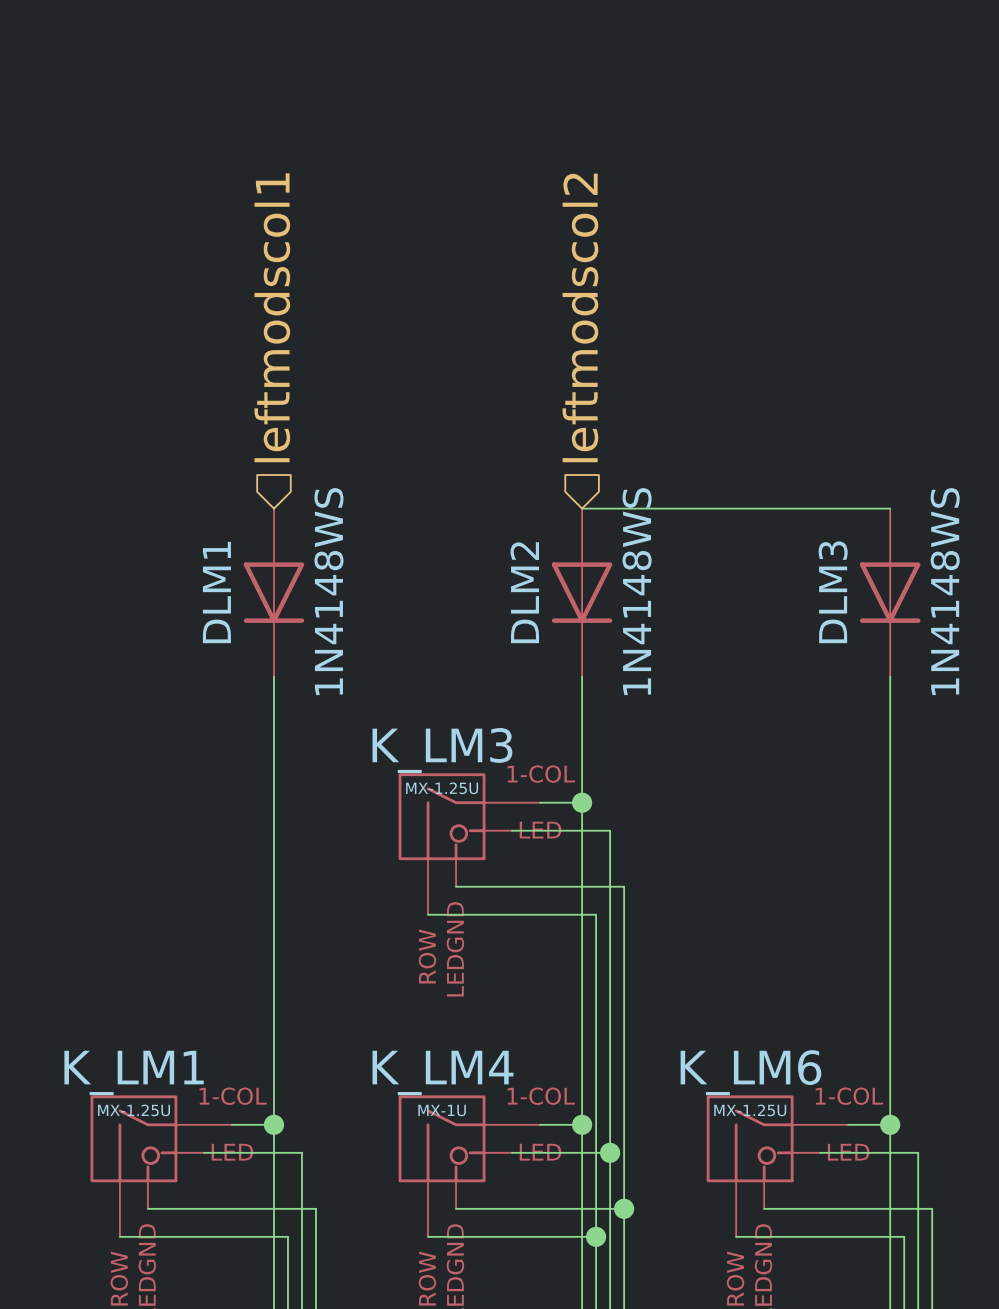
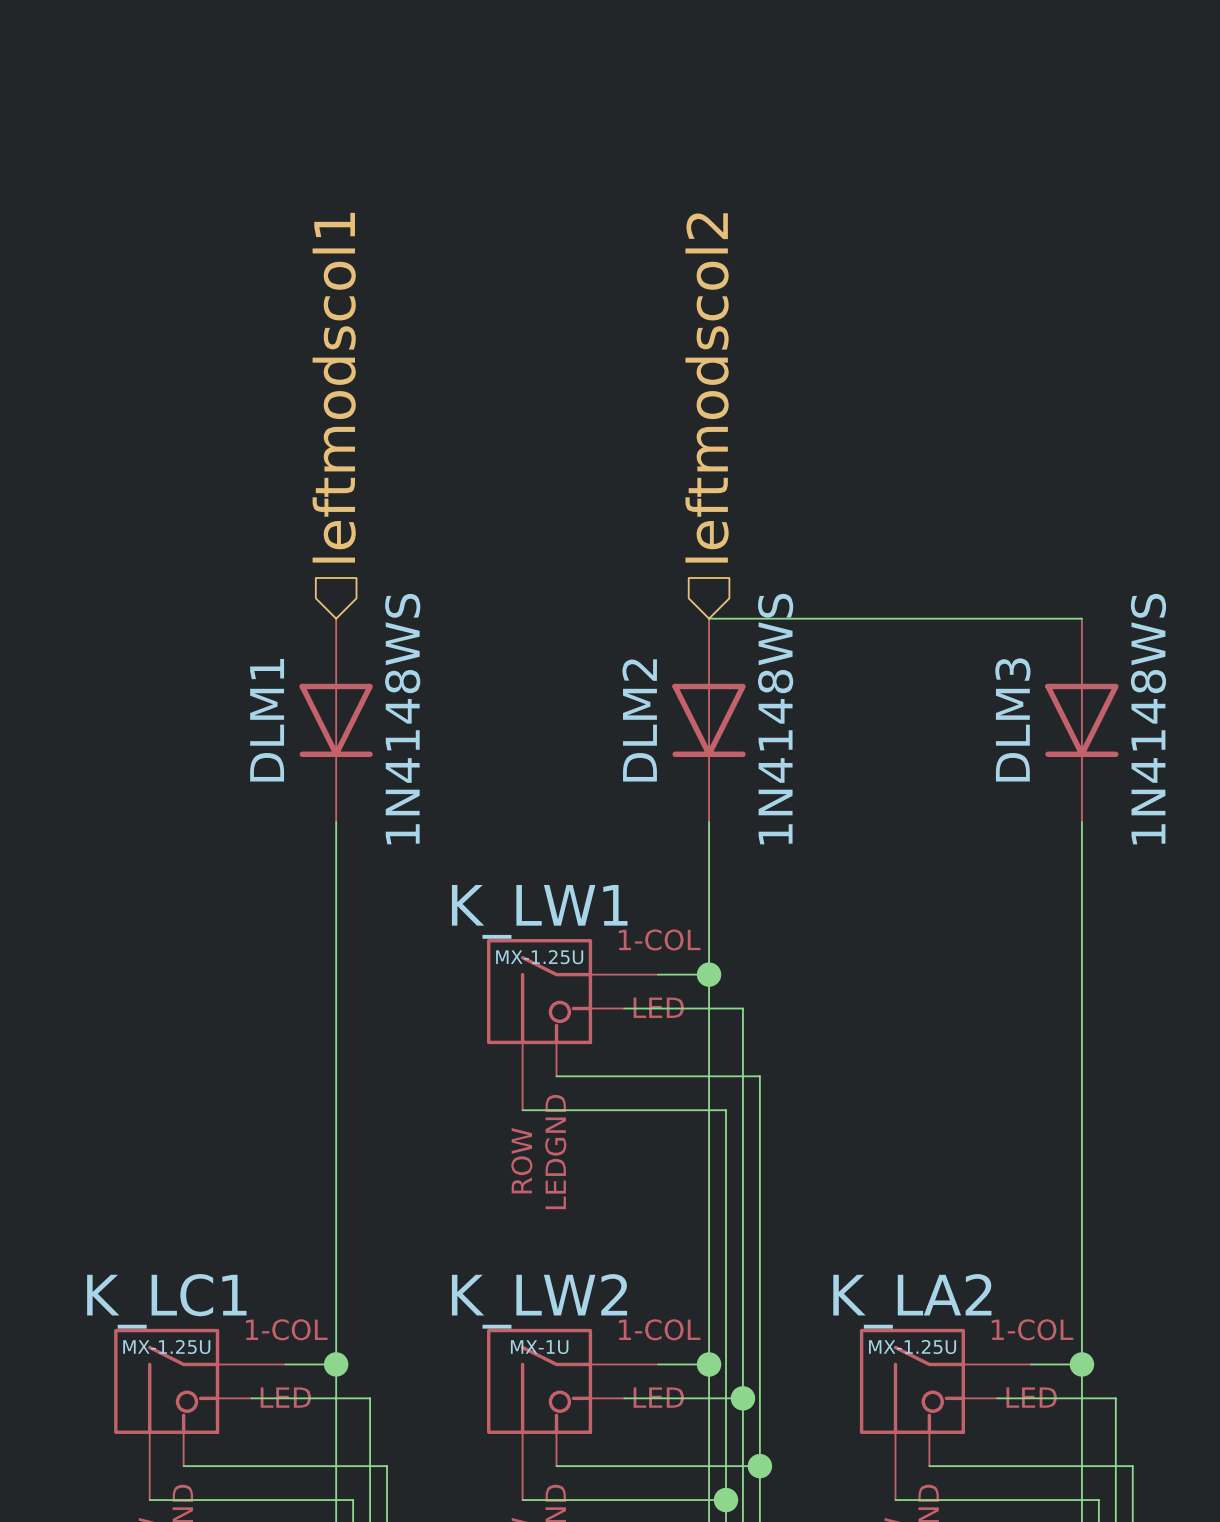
K_LM3 name: K_LM3 (442, 750) -> K_LW1 (539, 911)
K_LM1 name: K_LM1 (134, 1072) -> K_LC1 (166, 1301)
K_LM4 name: K_LM4 (443, 1072) -> K_LW2 (539, 1301)
K_LM6 name: K_LM6 (750, 1072) -> K_LA2 (912, 1301)

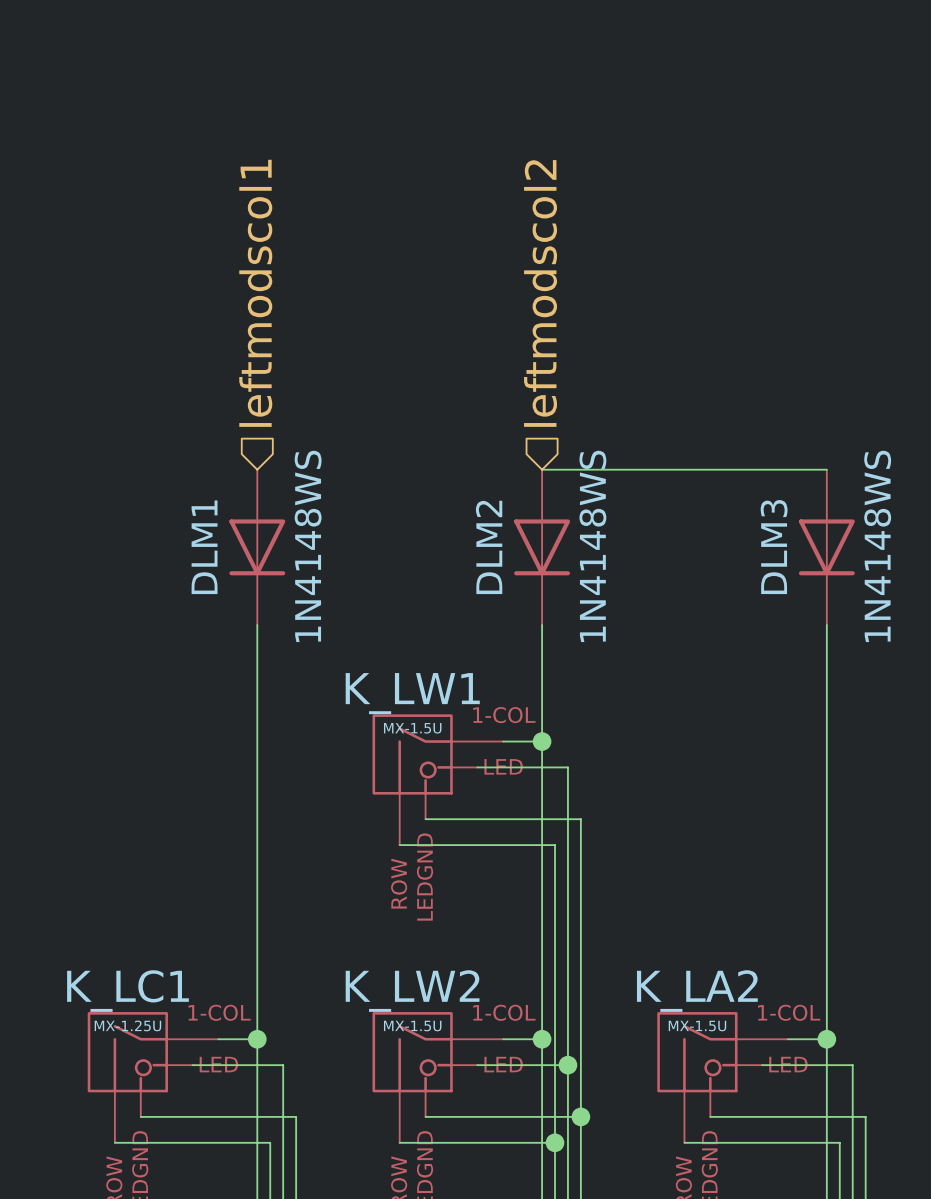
K_LW1 value: MX-1.25U (539, 957) -> MX-1.5U (412, 728)
K_LW2 value: MX-1U (539, 1347) -> MX-1.5U (412, 1026)
K_LA2 value: MX-1.25U (912, 1347) -> MX-1.5U (697, 1026)

